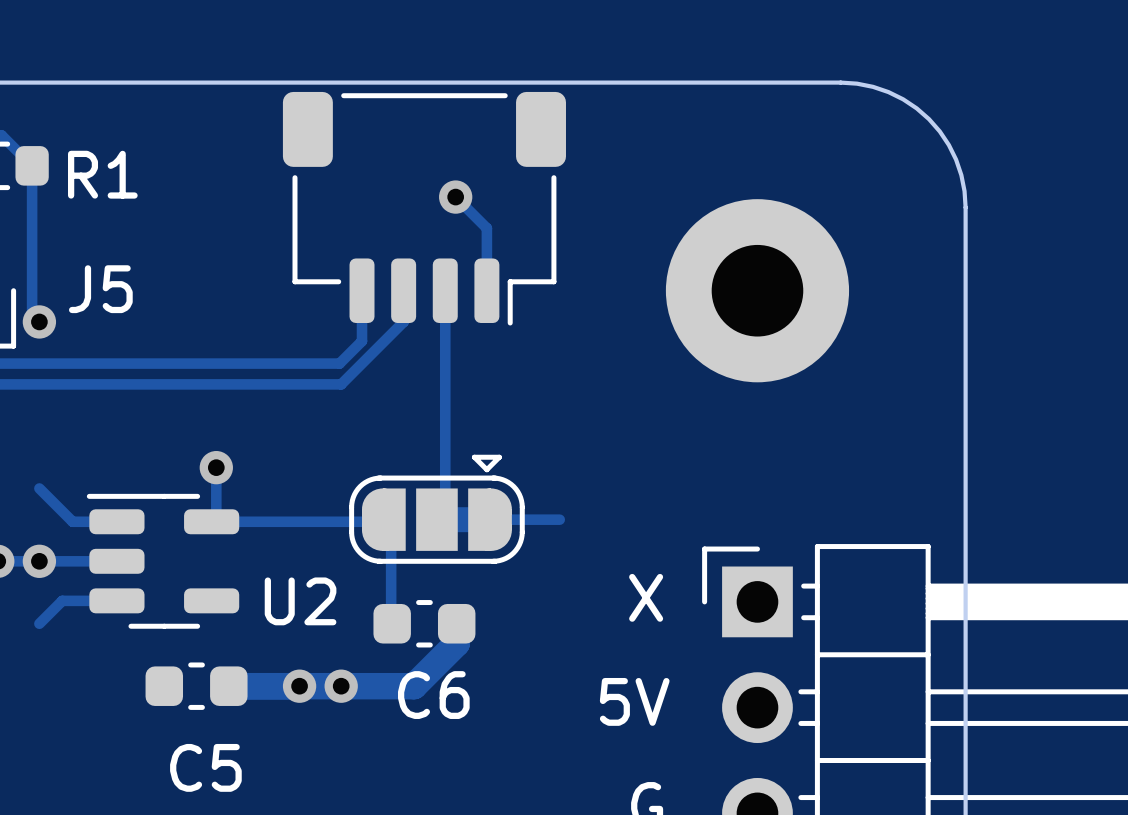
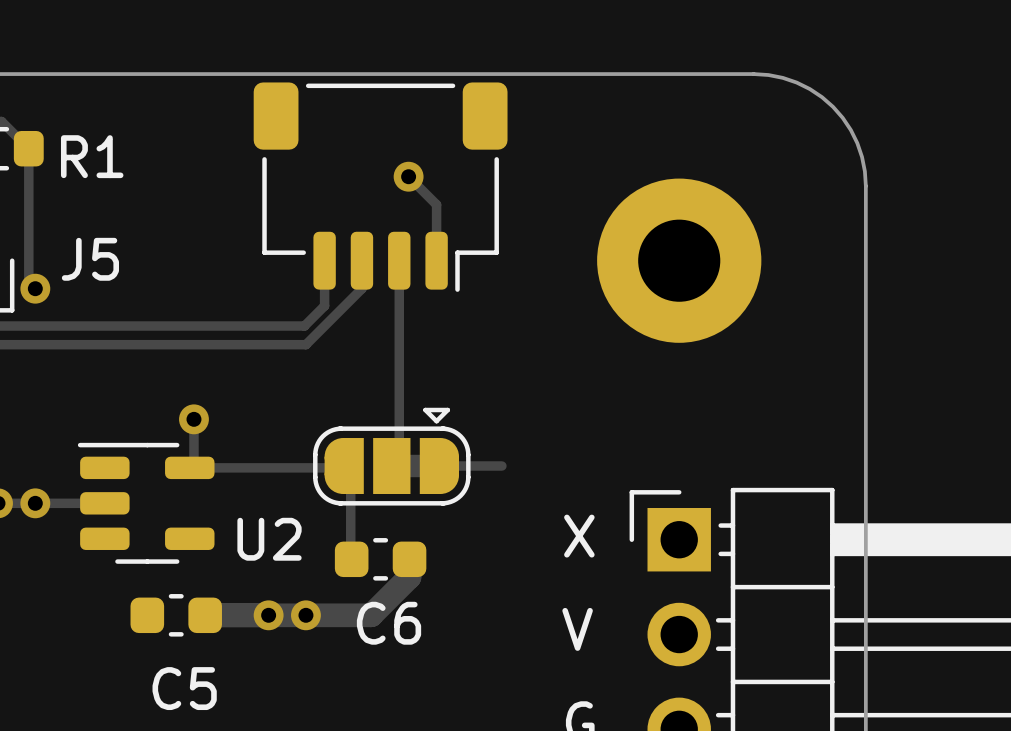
track: (39, 488) (72, 521) (116, 521) -> none
track: (116, 600) (62, 600) (39, 623) -> none
text: 5V (634, 701) -> V (577, 629)

